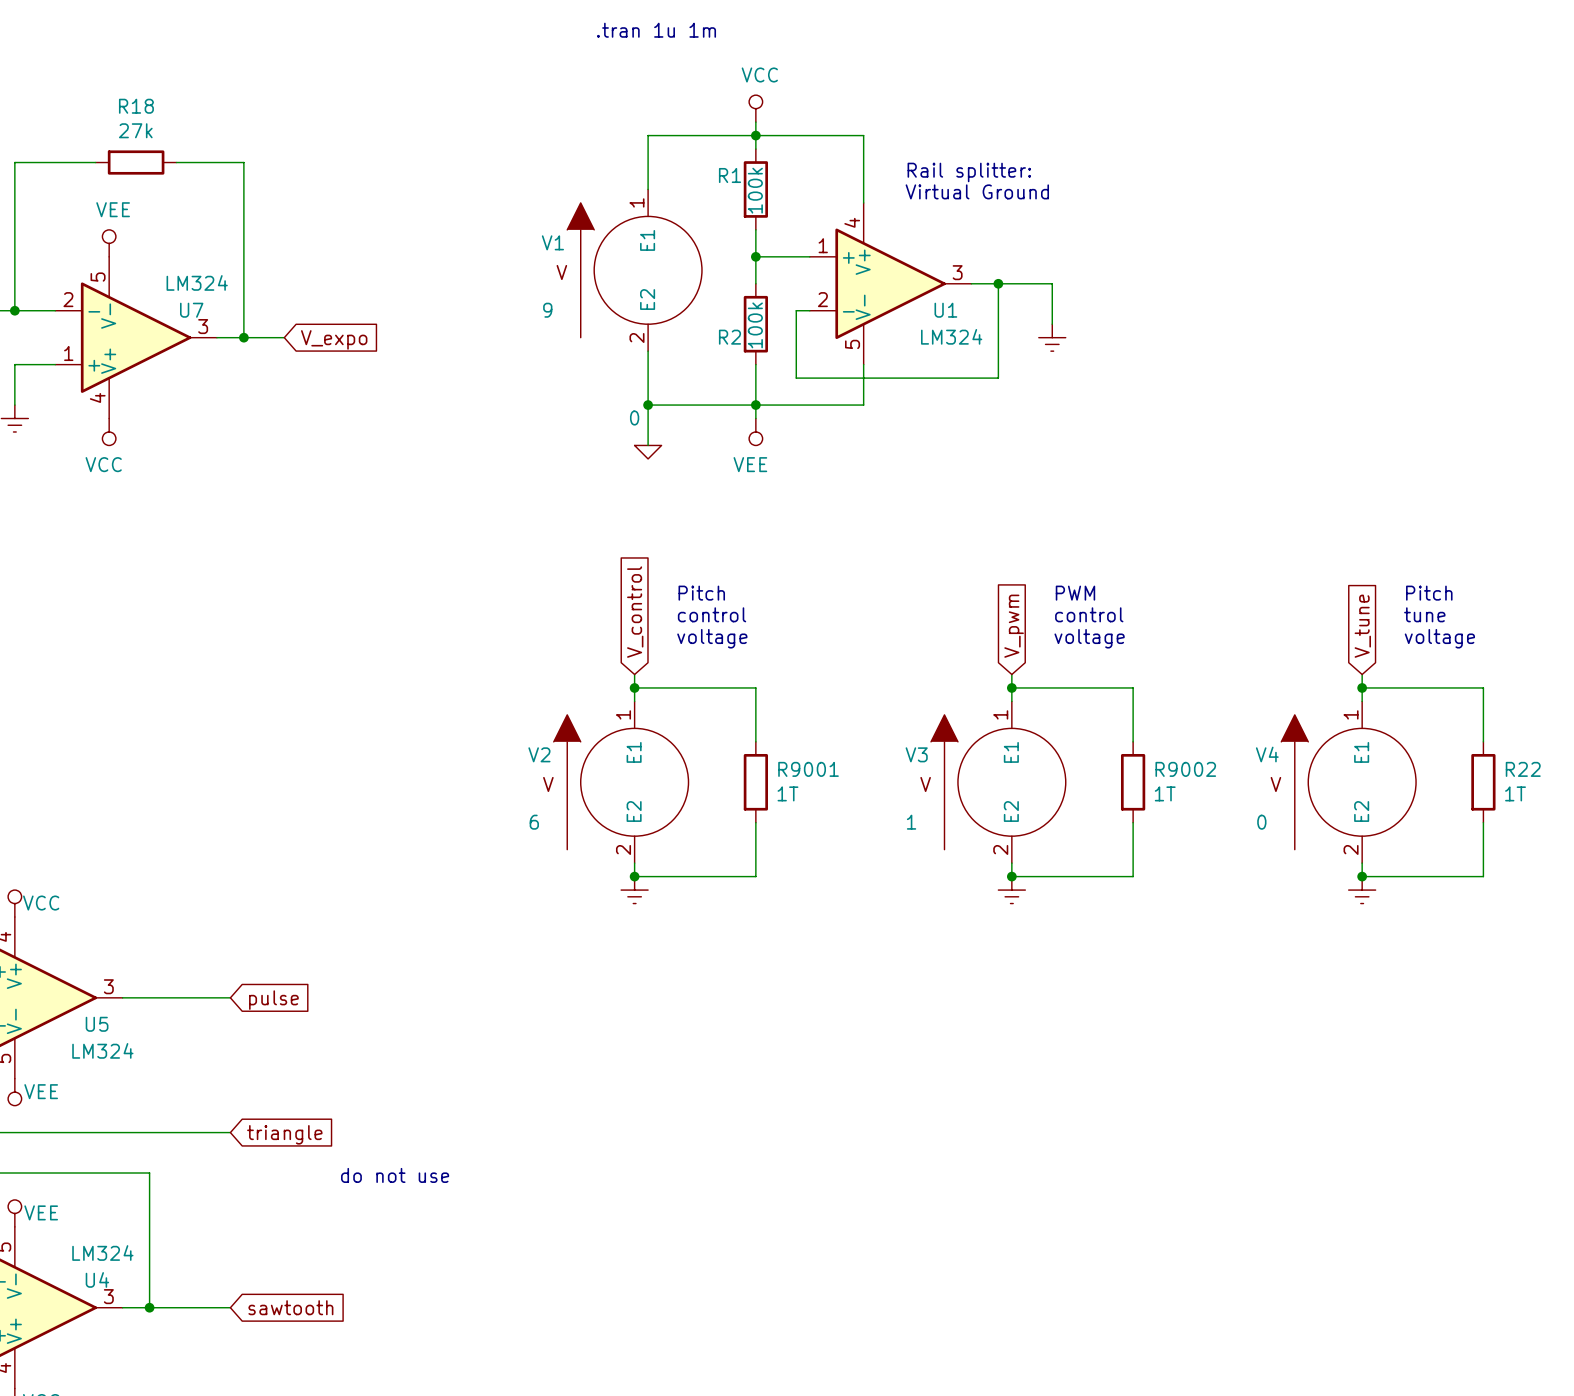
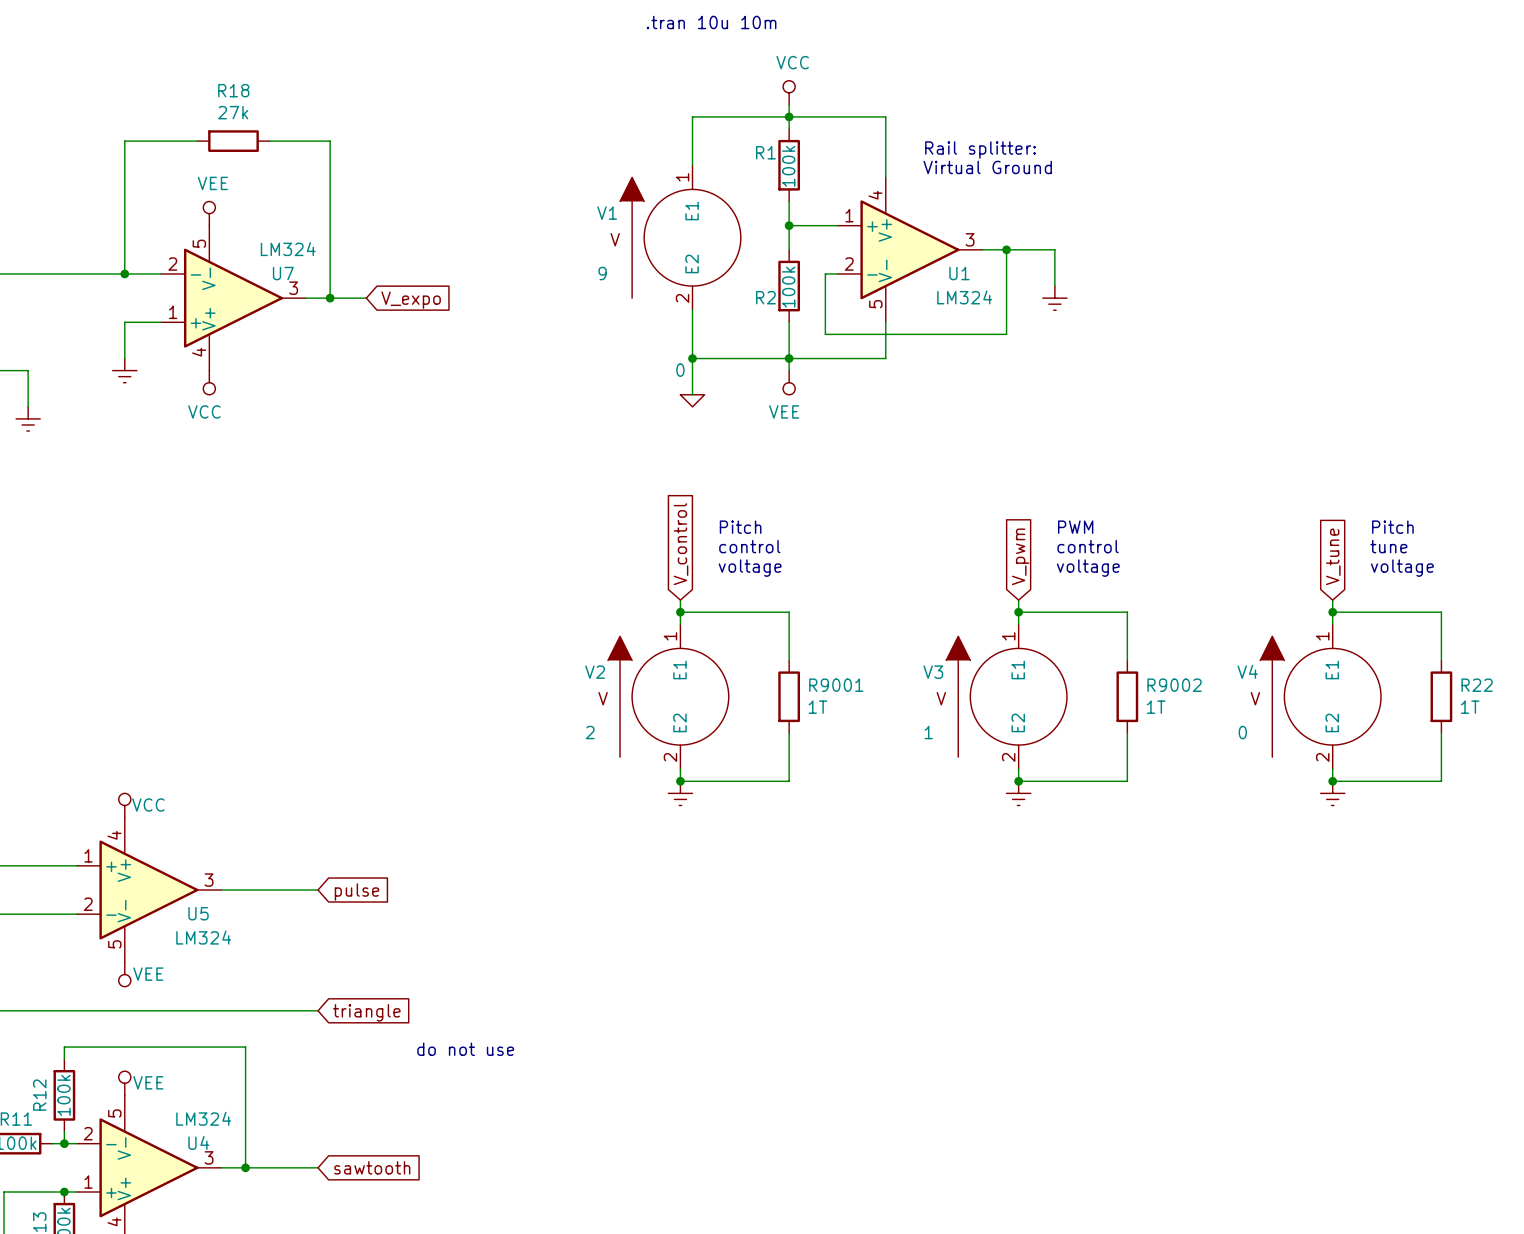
text: .tran 1u 1m (656, 30) -> .tran 10u 10m (711, 22)
V2 value: 6 (534, 822) -> 2 (590, 732)

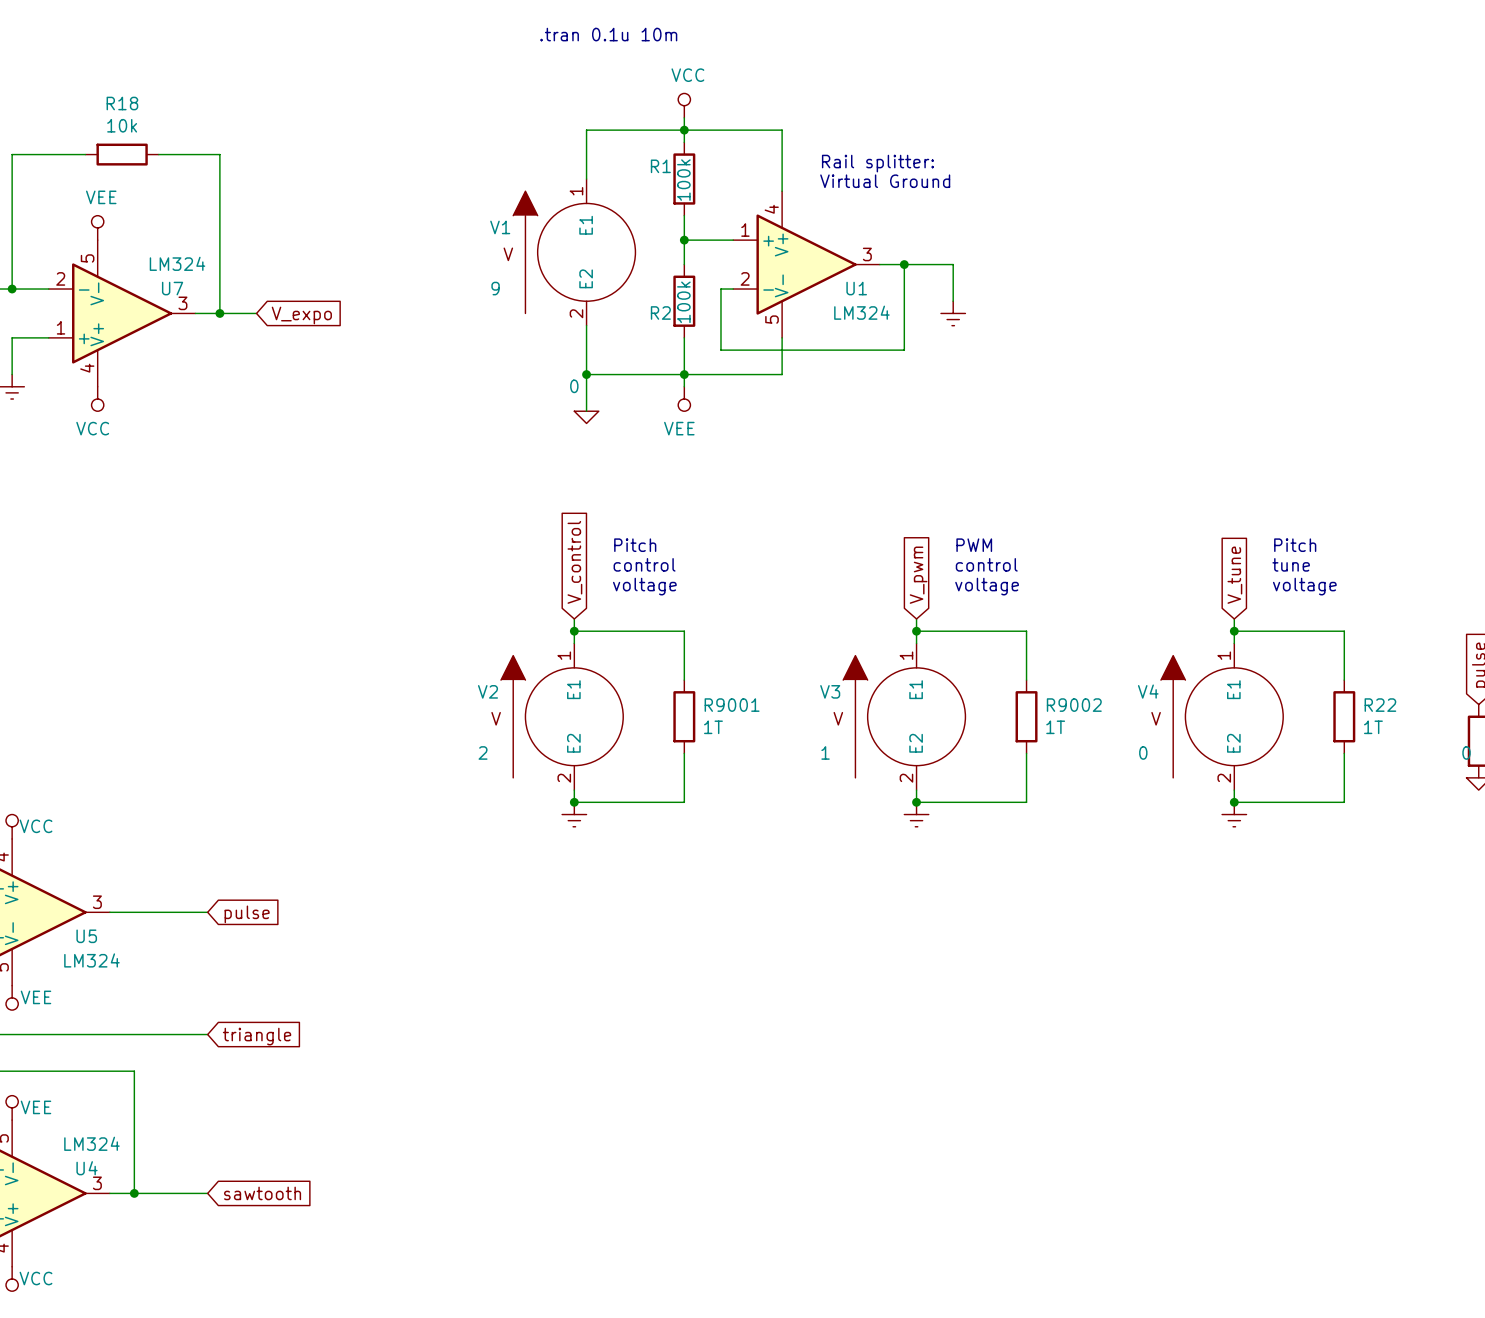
text: .tran 10u 10m (711, 22) -> .tran 0.1u 10m (608, 34)
R18 value: 27k (233, 112) -> 10k (122, 125)
text: do not use (465, 1049) -> none

